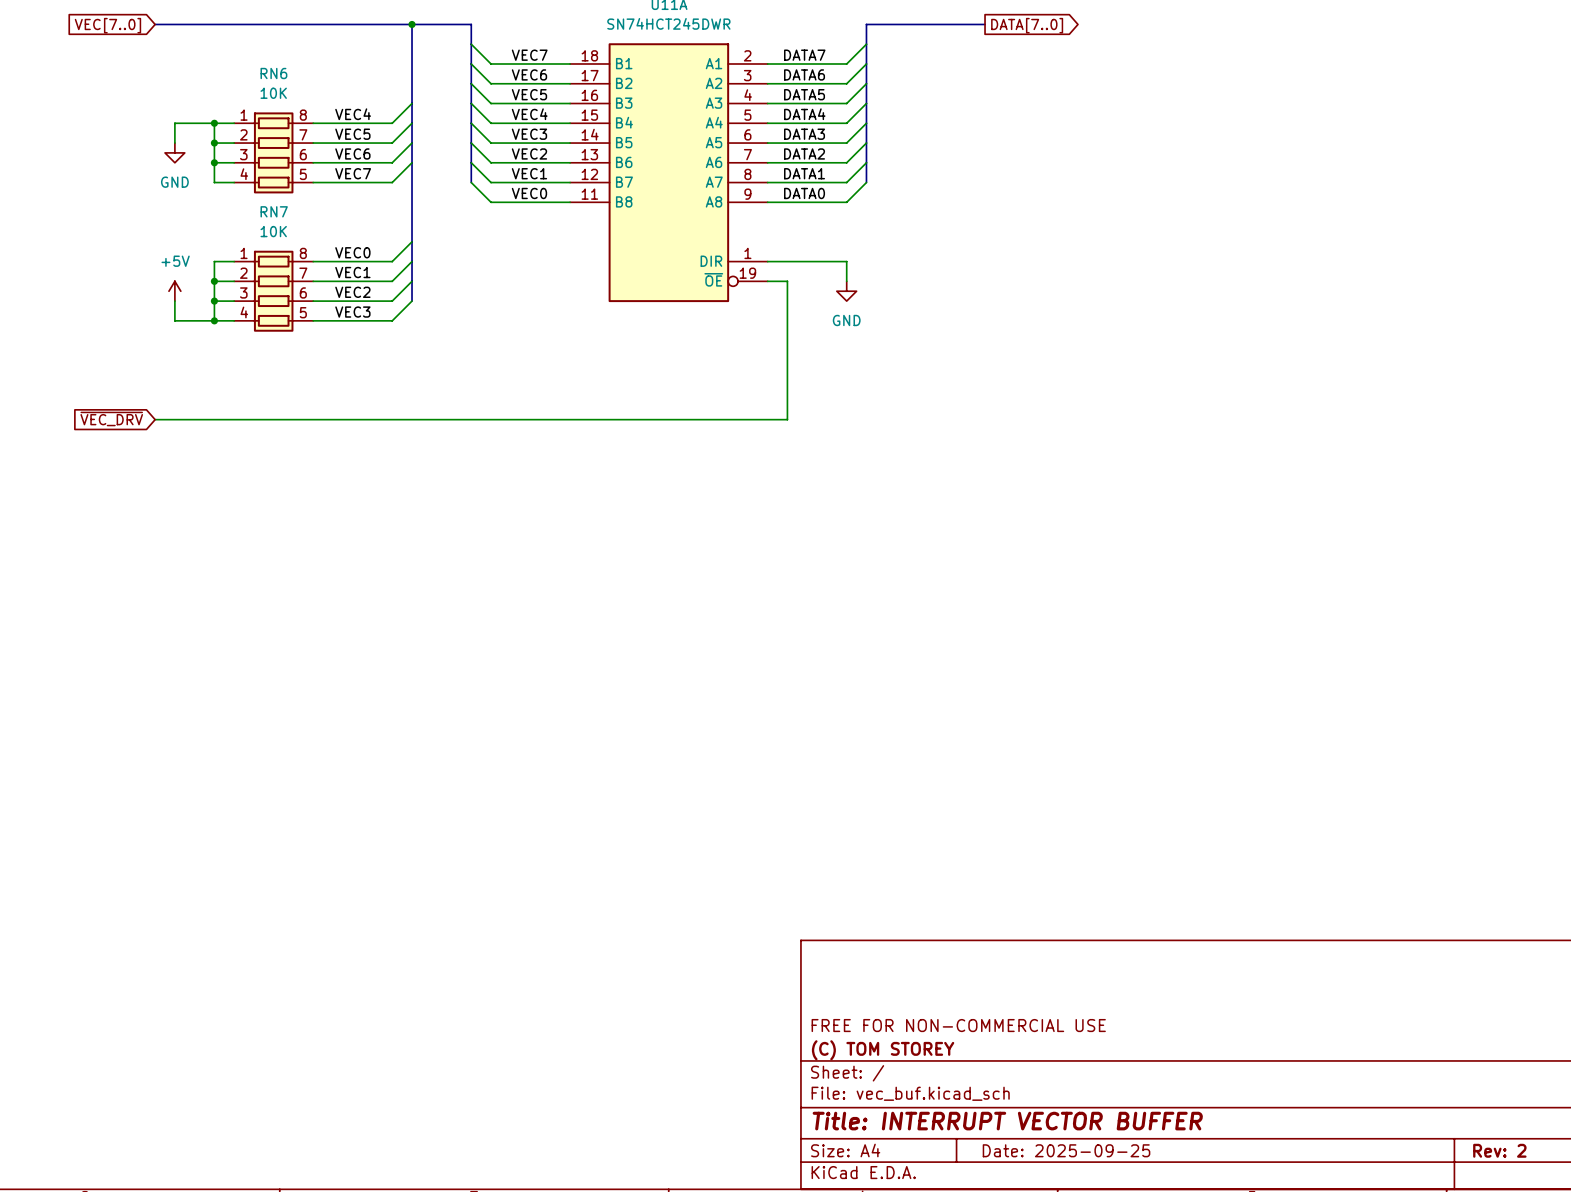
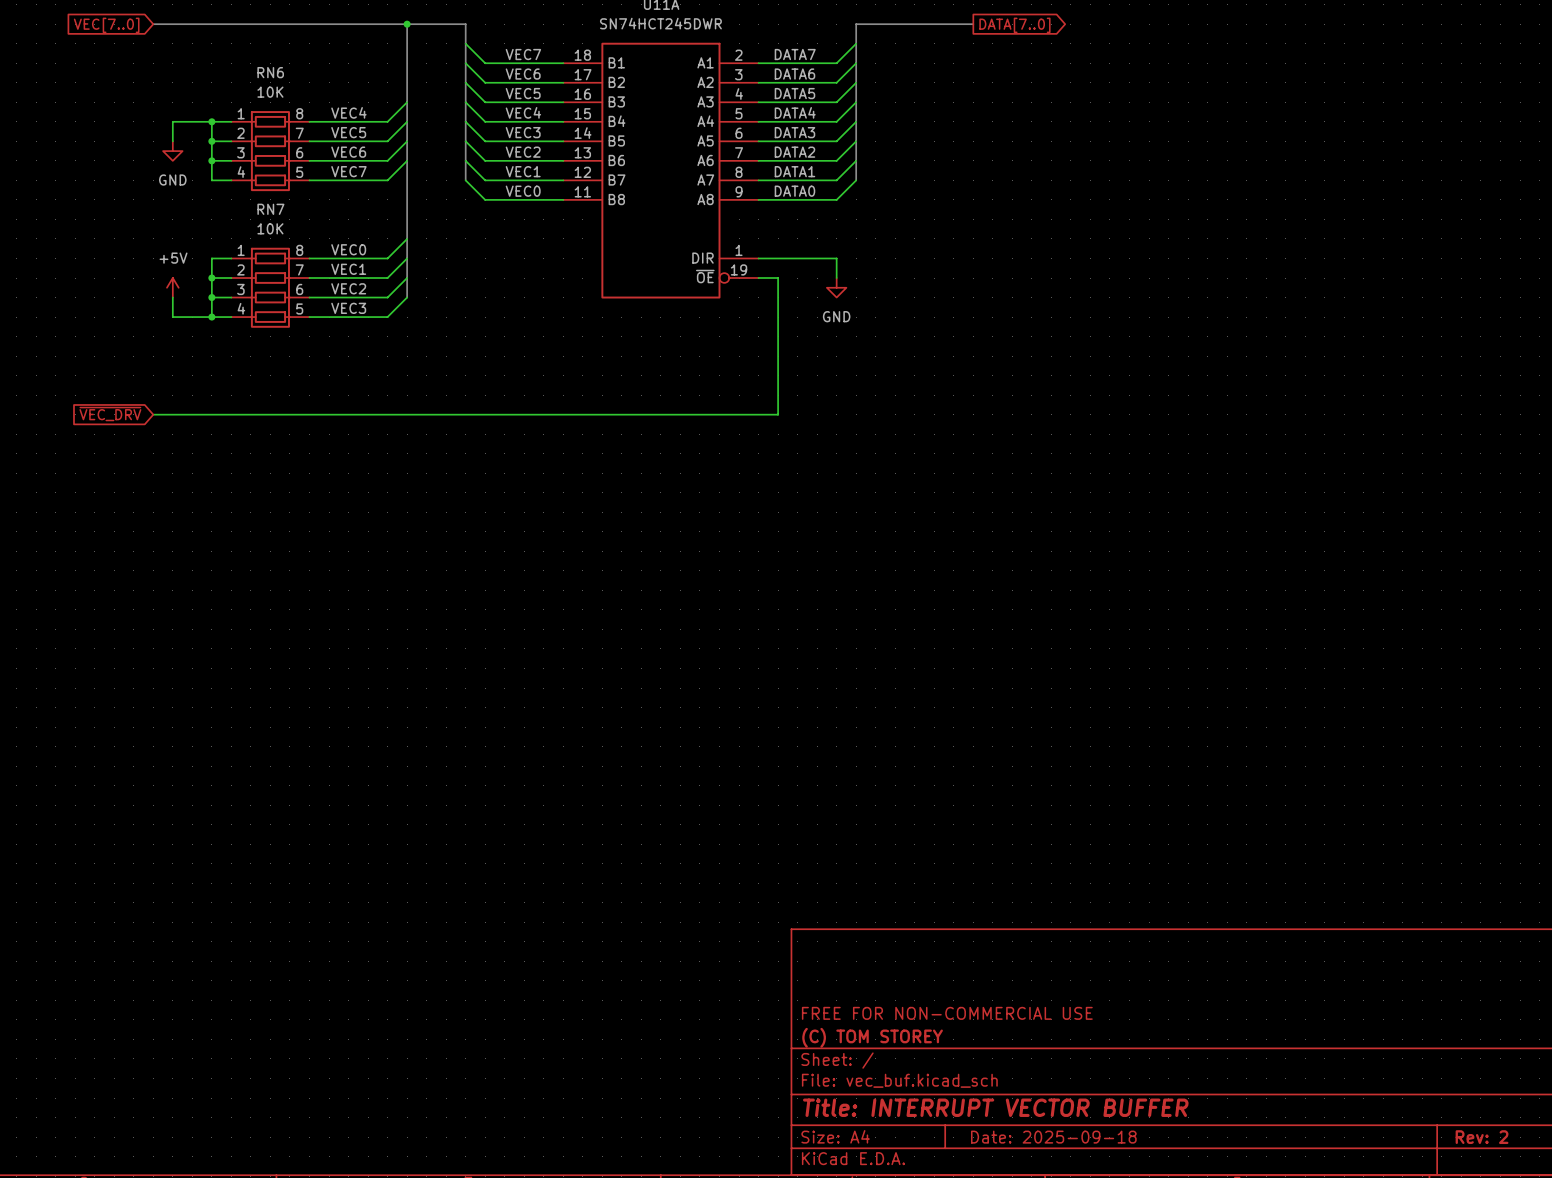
title block: Date: 2025-09-25 (1066, 1150) -> Date: 2025-09-18 (1053, 1137)

